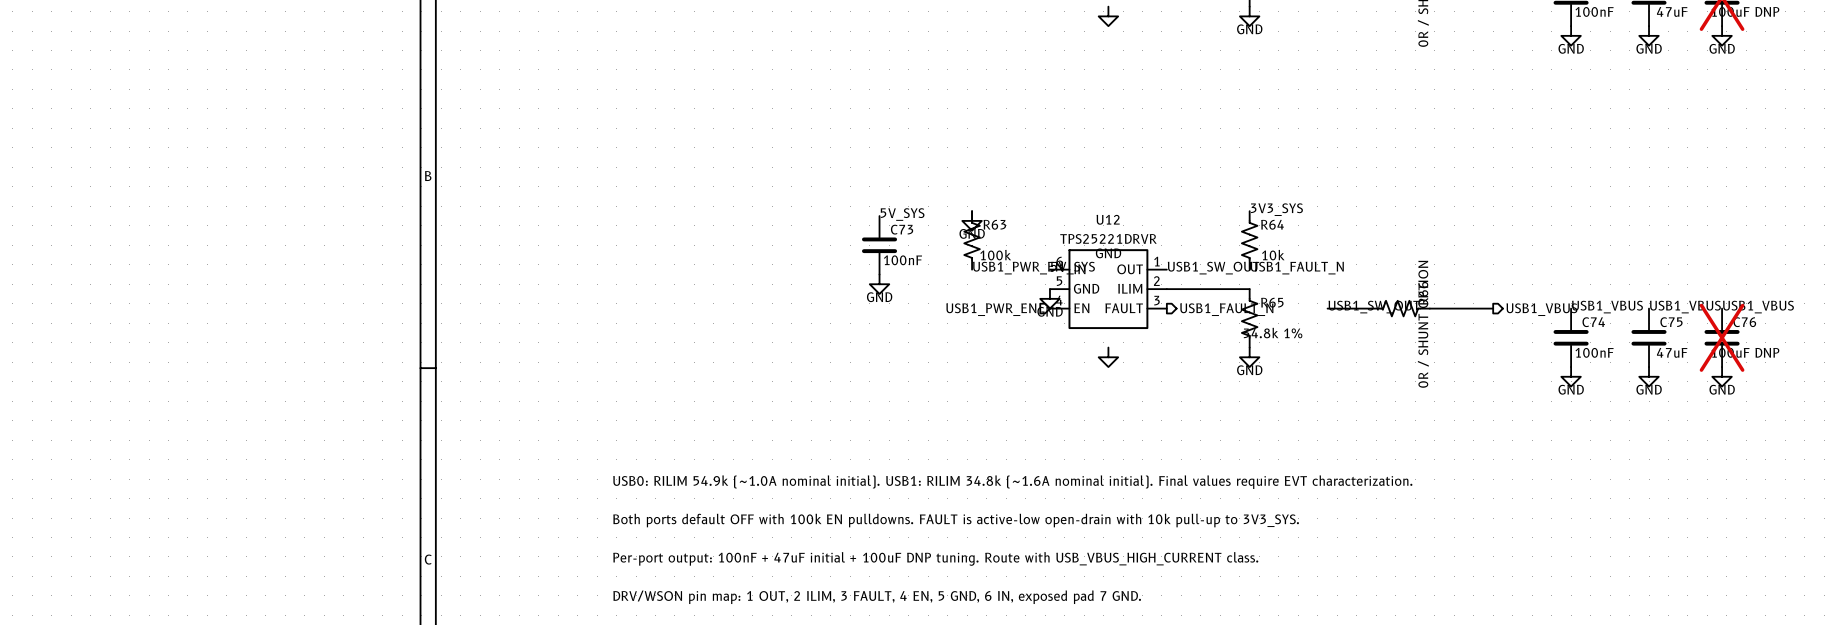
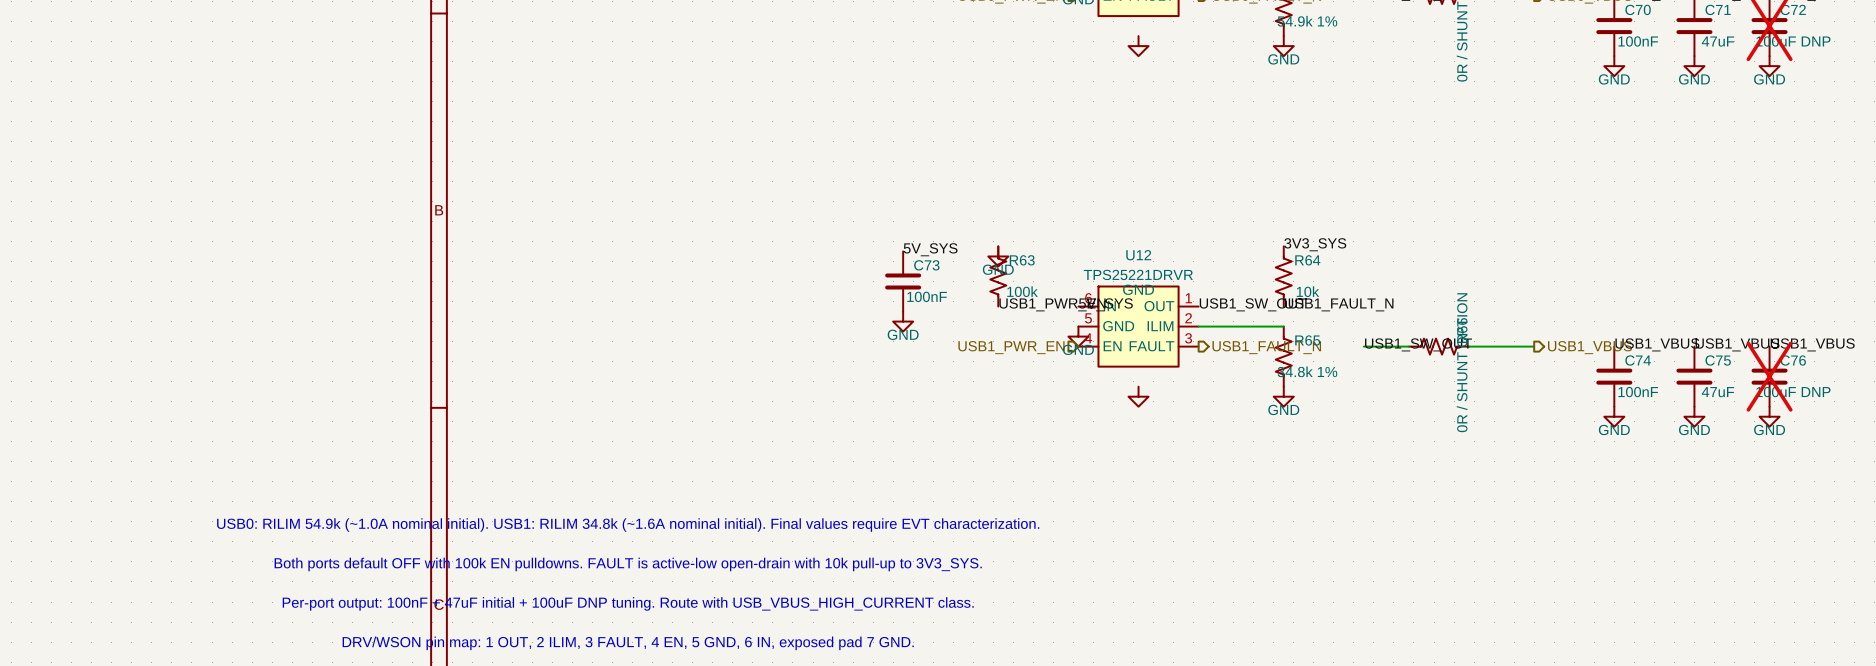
text position: USB0: RILIM 54.9k (~1.0A nominal initial). USB1: RILIM 34.8k (~1.6A nominal initial). Final values require EVT characterization. (1012, 482) -> USB0: RILIM 54.9k (~1.0A nominal initial). USB1: RILIM 34.8k (~1.6A nominal initial). Final values require EVT characterization. (628, 525)
text position: Both ports default OFF with 100k EN pulldowns. FAULT is active-low open-drain with 10k pull-up to 3V3_SYS. (956, 520) -> Both ports default OFF with 100k EN pulldowns. FAULT is active-low open-drain with 10k pull-up to 3V3_SYS. (628, 564)
text position: Per-port output: 100nF + 47uF initial + 100uF DNP tuning. Route with USB_VBUS_HIGH_CURRENT class. (935, 558) -> Per-port output: 100nF + 47uF initial + 100uF DNP tuning. Route with USB_VBUS_HIGH_CURRENT class. (628, 603)
text position: DRV/WSON pin map: 1 OUT, 2 ILIM, 3 FAULT, 4 EN, 5 GND, 6 IN, exposed pad 7 GND. (877, 597) -> DRV/WSON pin map: 1 OUT, 2 ILIM, 3 FAULT, 4 EN, 5 GND, 6 IN, exposed pad 7 GND. (628, 643)

